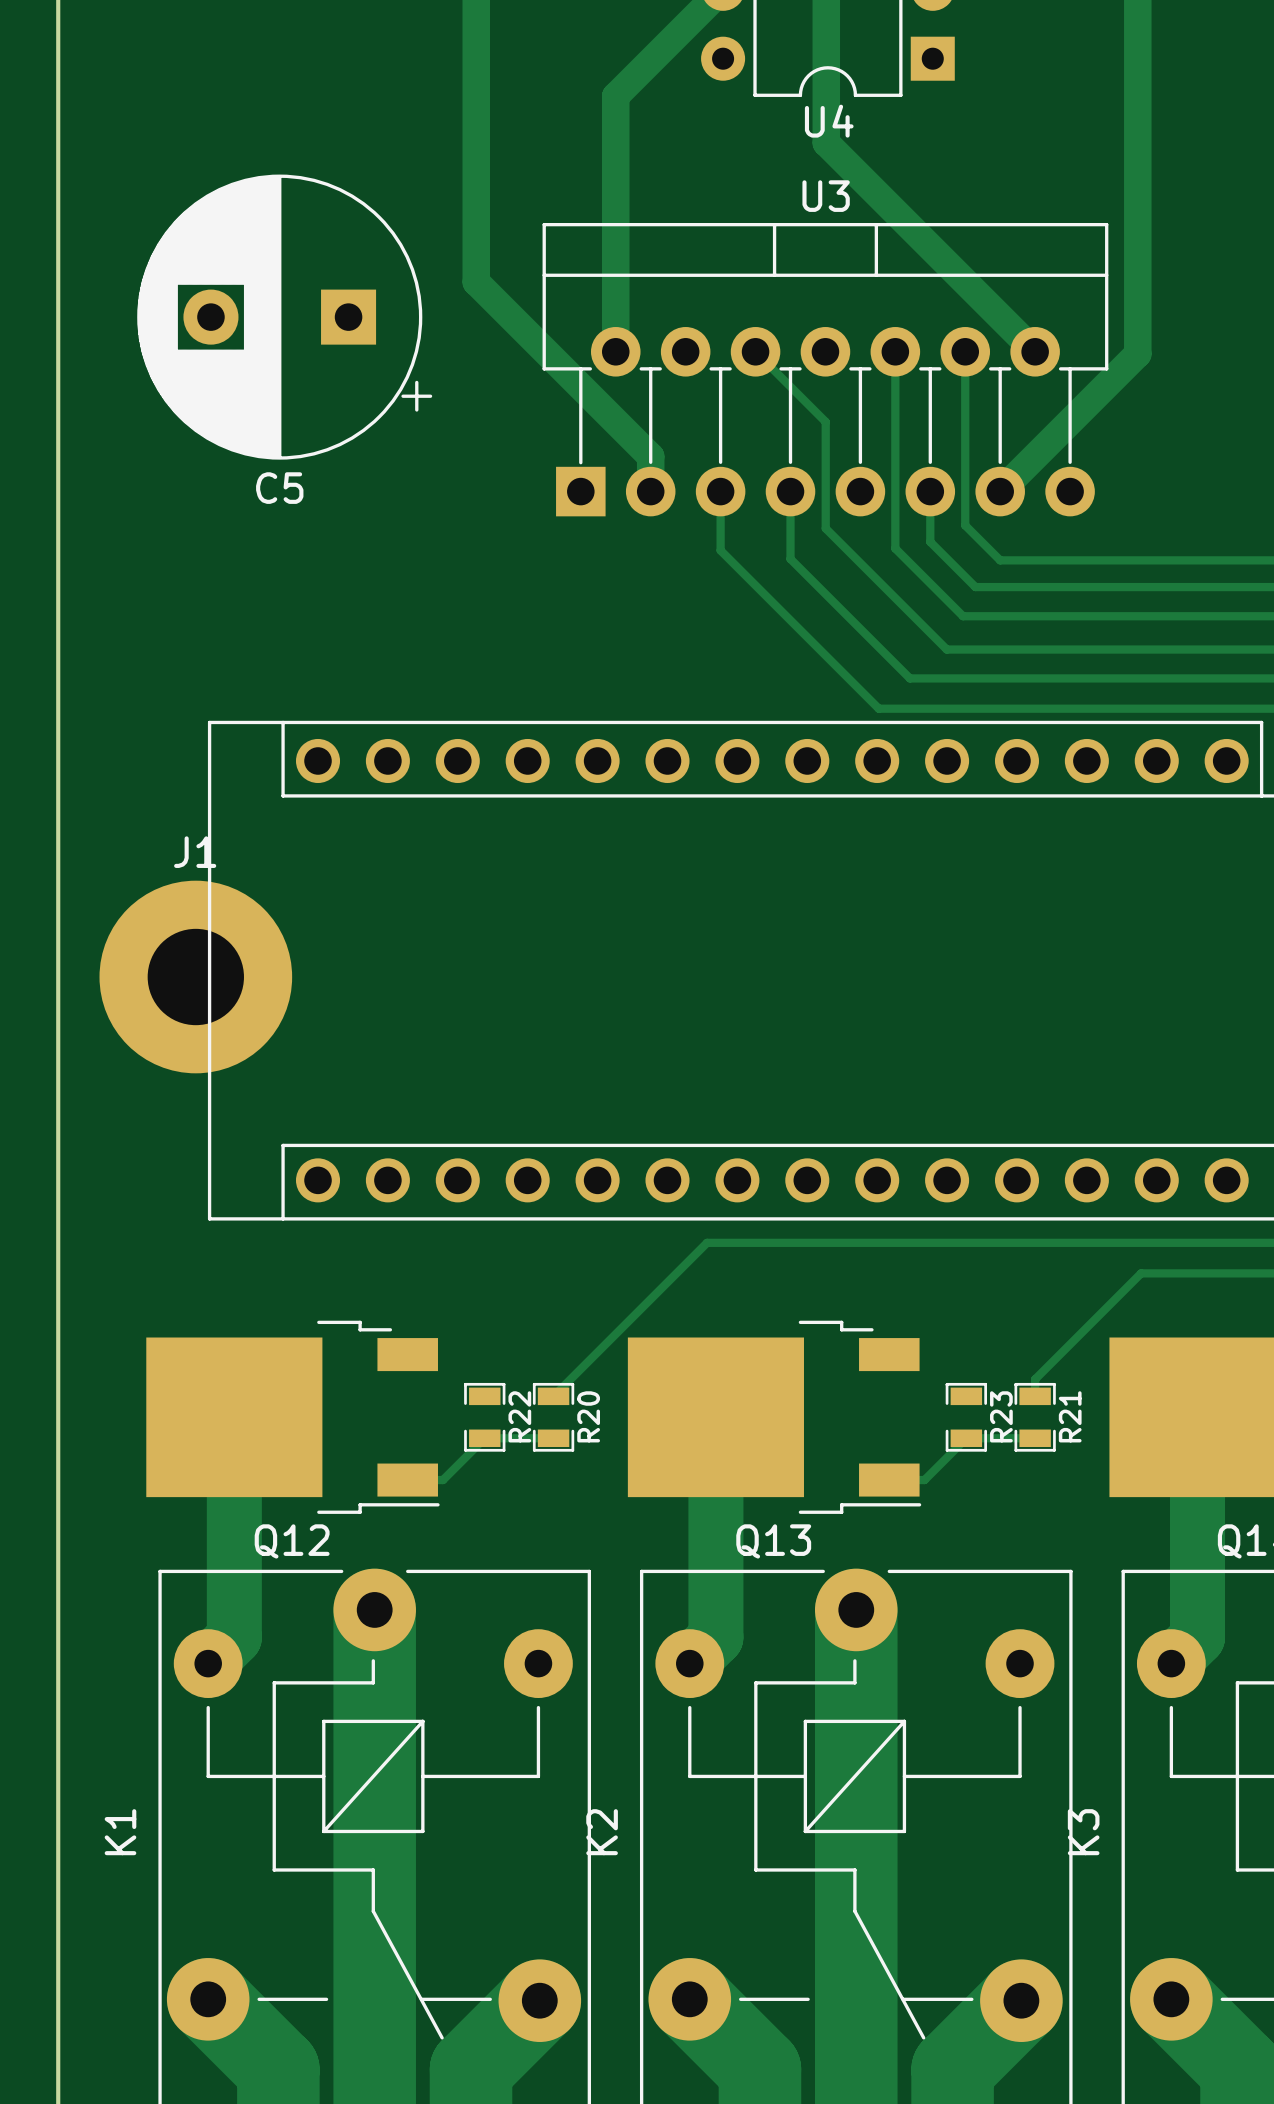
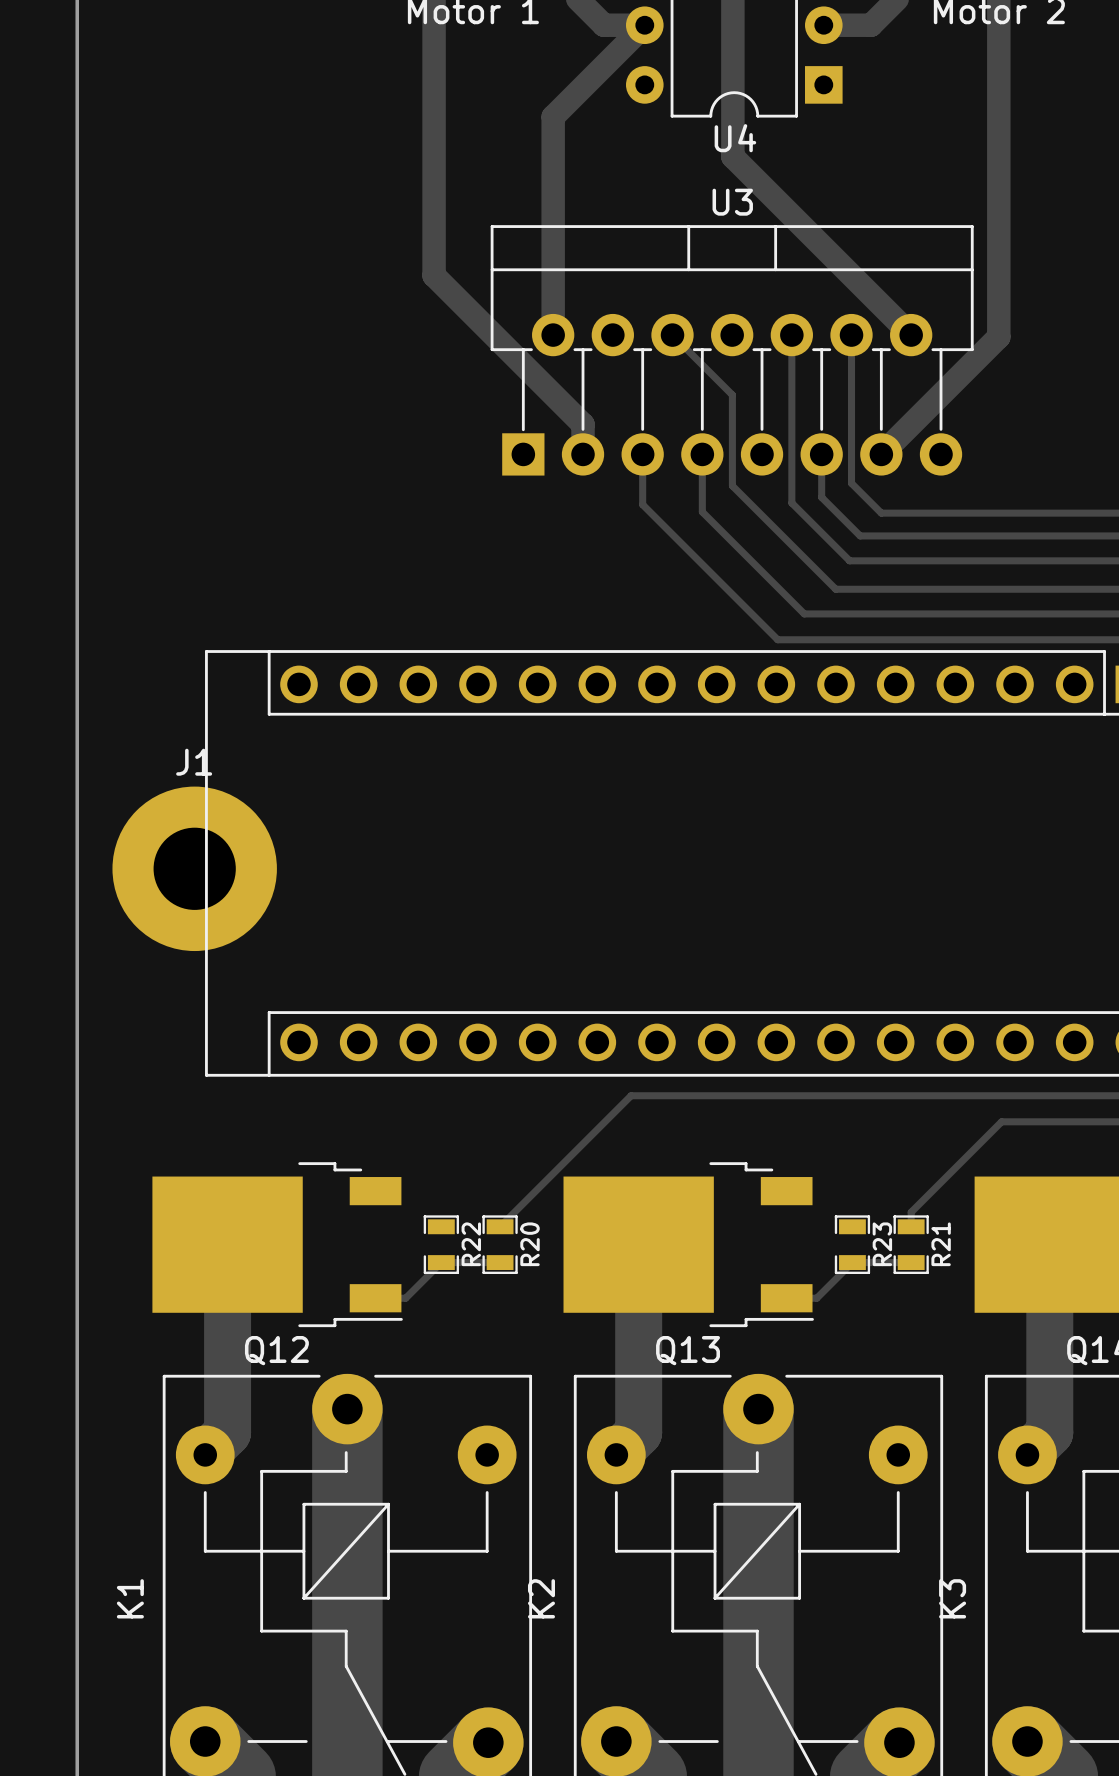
C5: (284, 317) -> none

